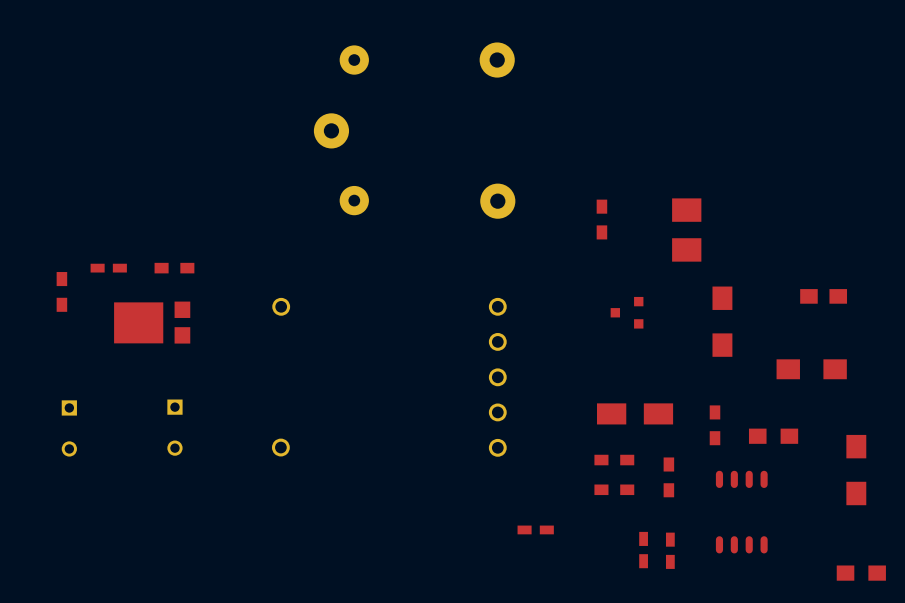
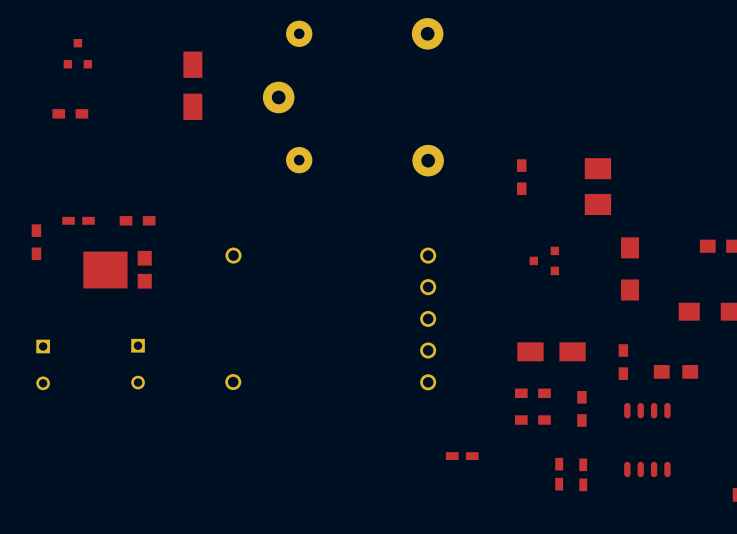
part: none -> (77, 53)
part: none -> (192, 85)
part: none -> (70, 113)

